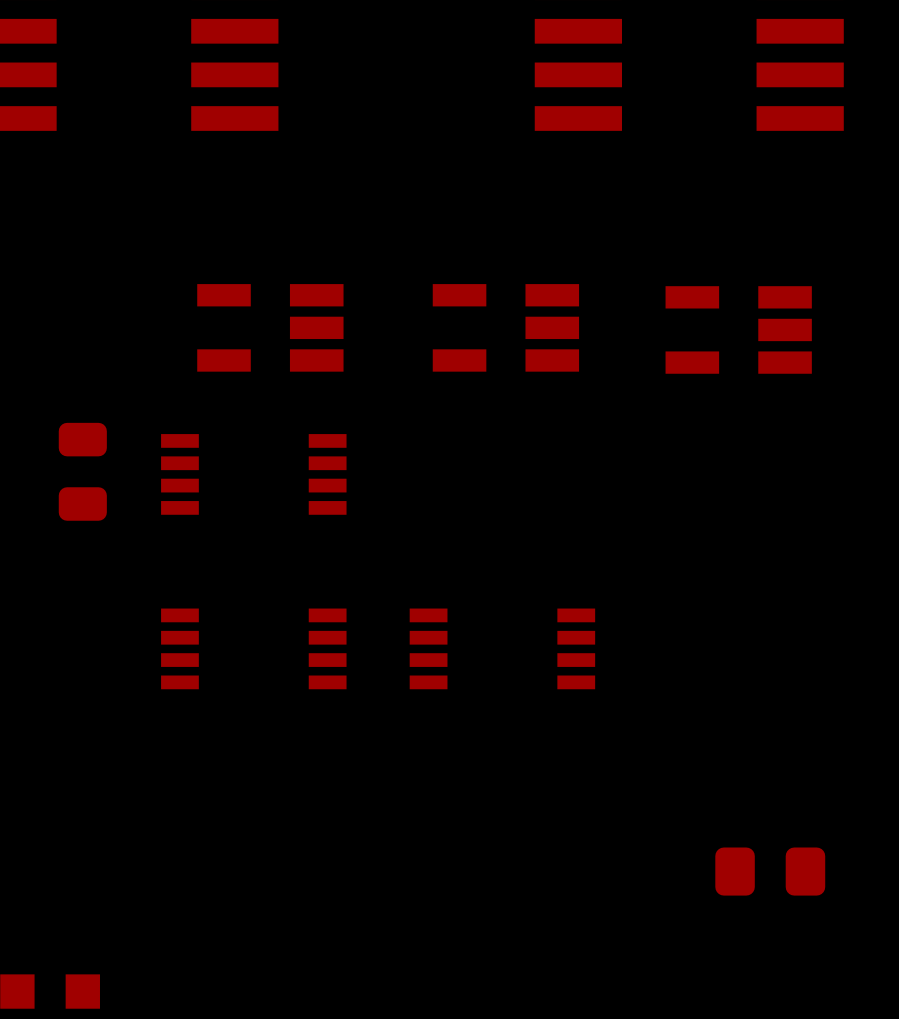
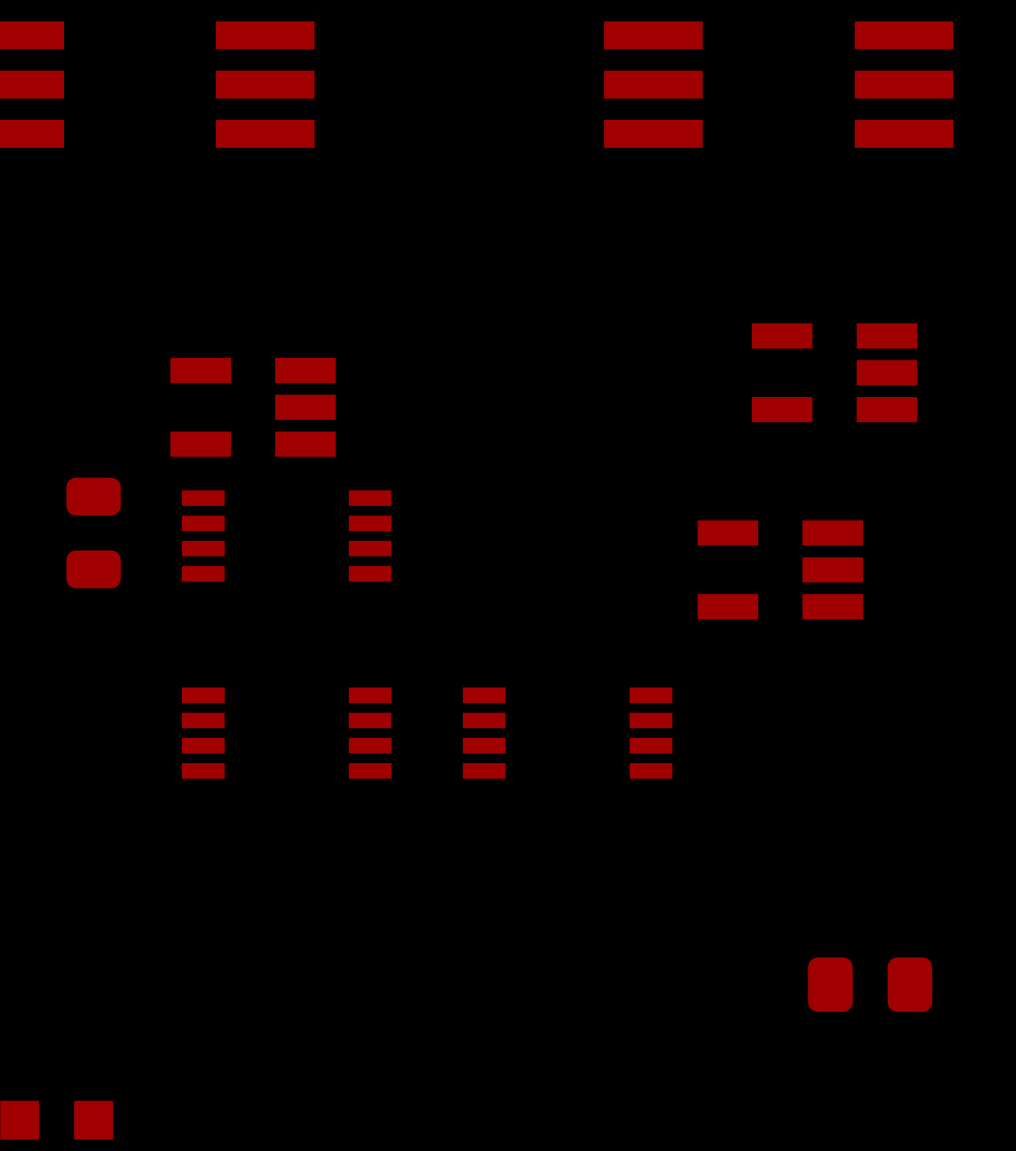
part position: (270, 327) -> (253, 407)
part: (505, 327) -> none
part: none -> (780, 569)

